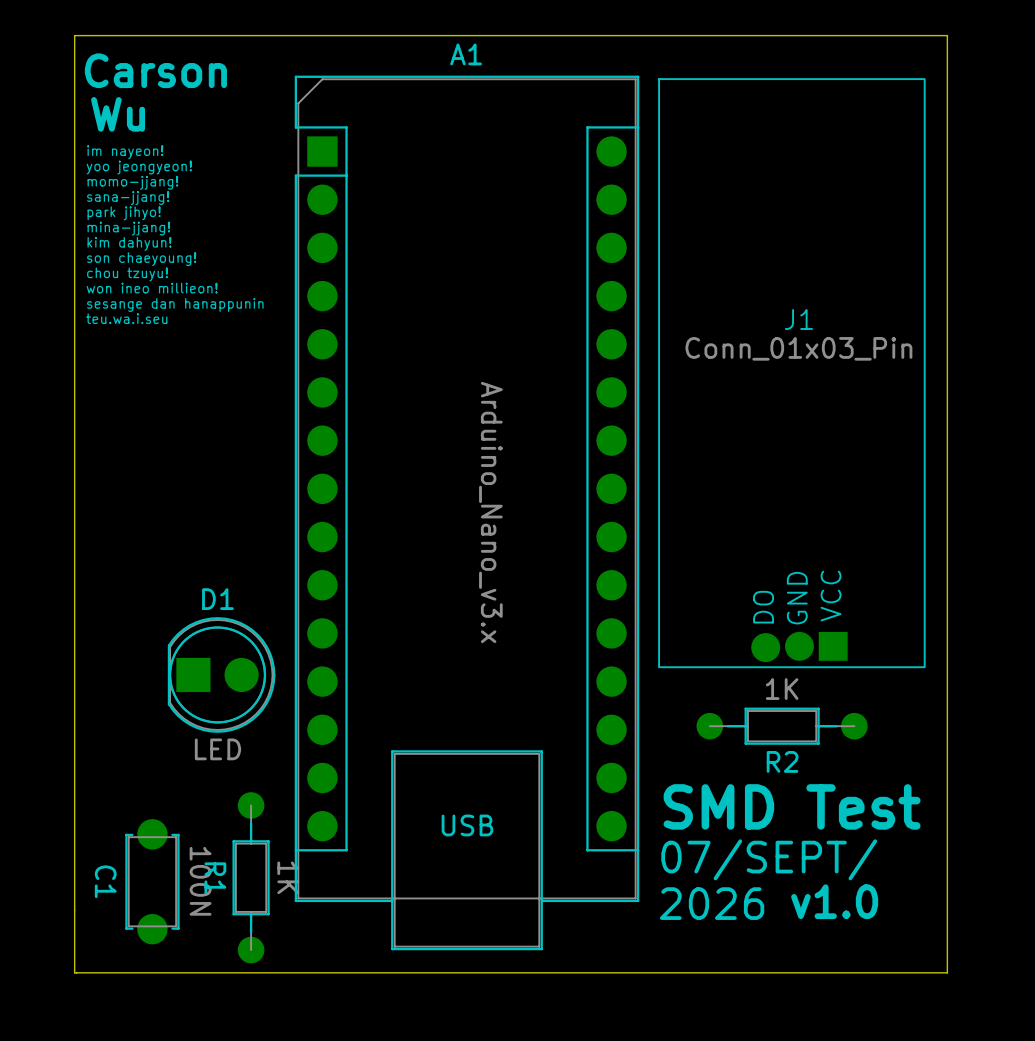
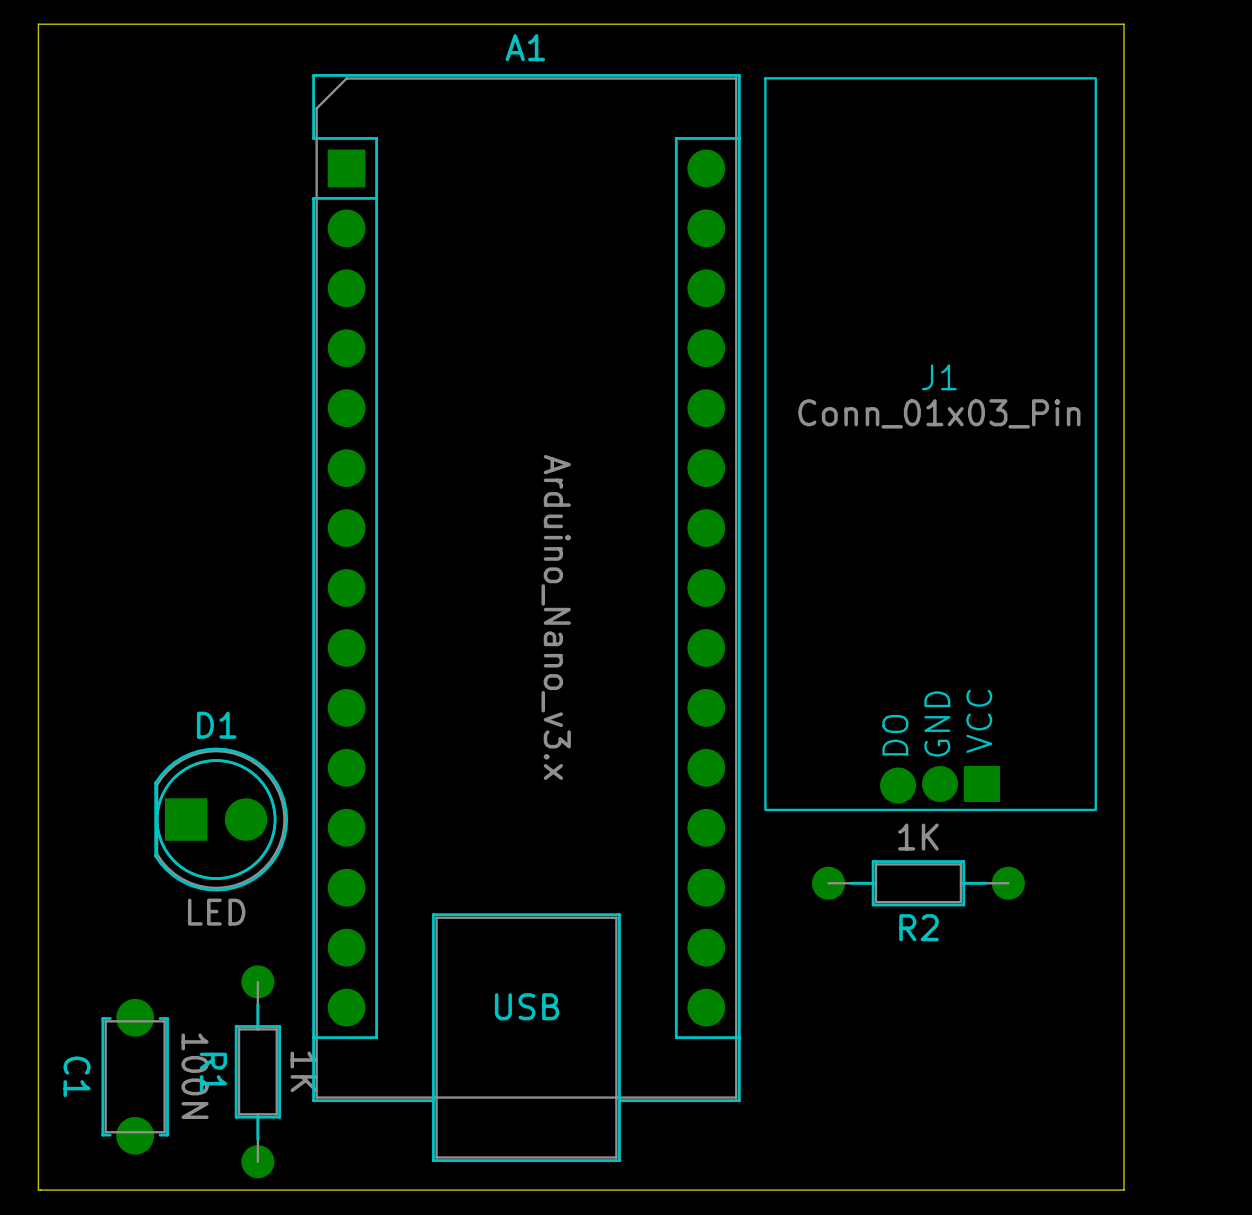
text: Carson (155, 70) -> none
text: Wu (118, 114) -> none
text: im nayeon! (125, 152) -> none
text: yoo jeongyeon! (139, 167) -> none
text: momo-jjang! (132, 182) -> none
text: sana-jjang! (128, 198) -> none
text: park jihyo! (124, 213) -> none
text: mina-jjang! (128, 228) -> none
text: kim dahyun! (129, 243) -> none
text: son chaeyoung! (141, 259) -> none
text: chou tzuyu! (127, 274) -> none
text: won ineo millieon! (152, 288) -> none
text: sesange dan hanappunin (175, 304) -> none
text: teu.wa.i.seu (126, 318) -> none
text: SMD Test (792, 806) -> none
text: 07/SEPT/ (769, 859) -> none
text: v1.0 (834, 901) -> none
text: 2026 (712, 903) -> none

